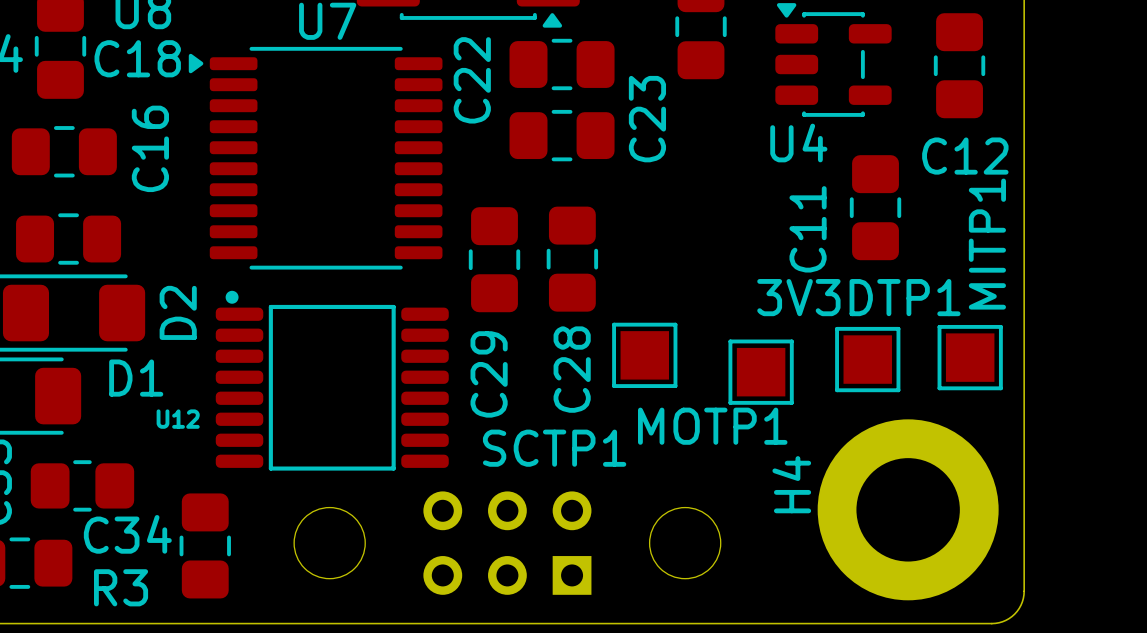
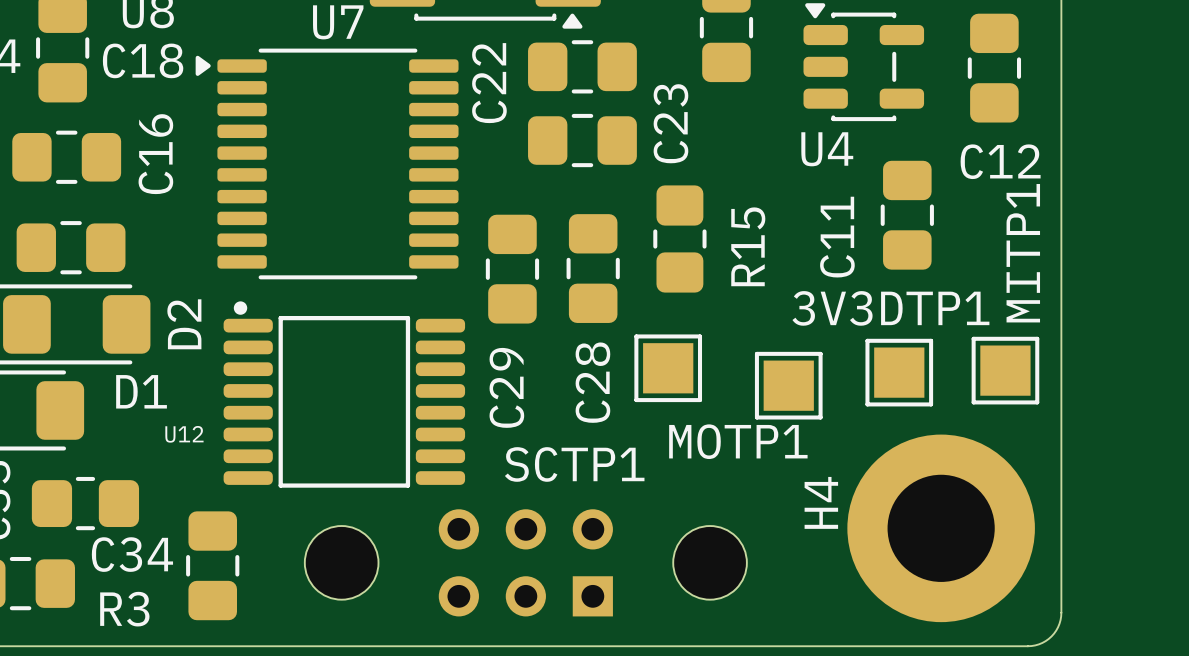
R15: none -> (679, 238)

